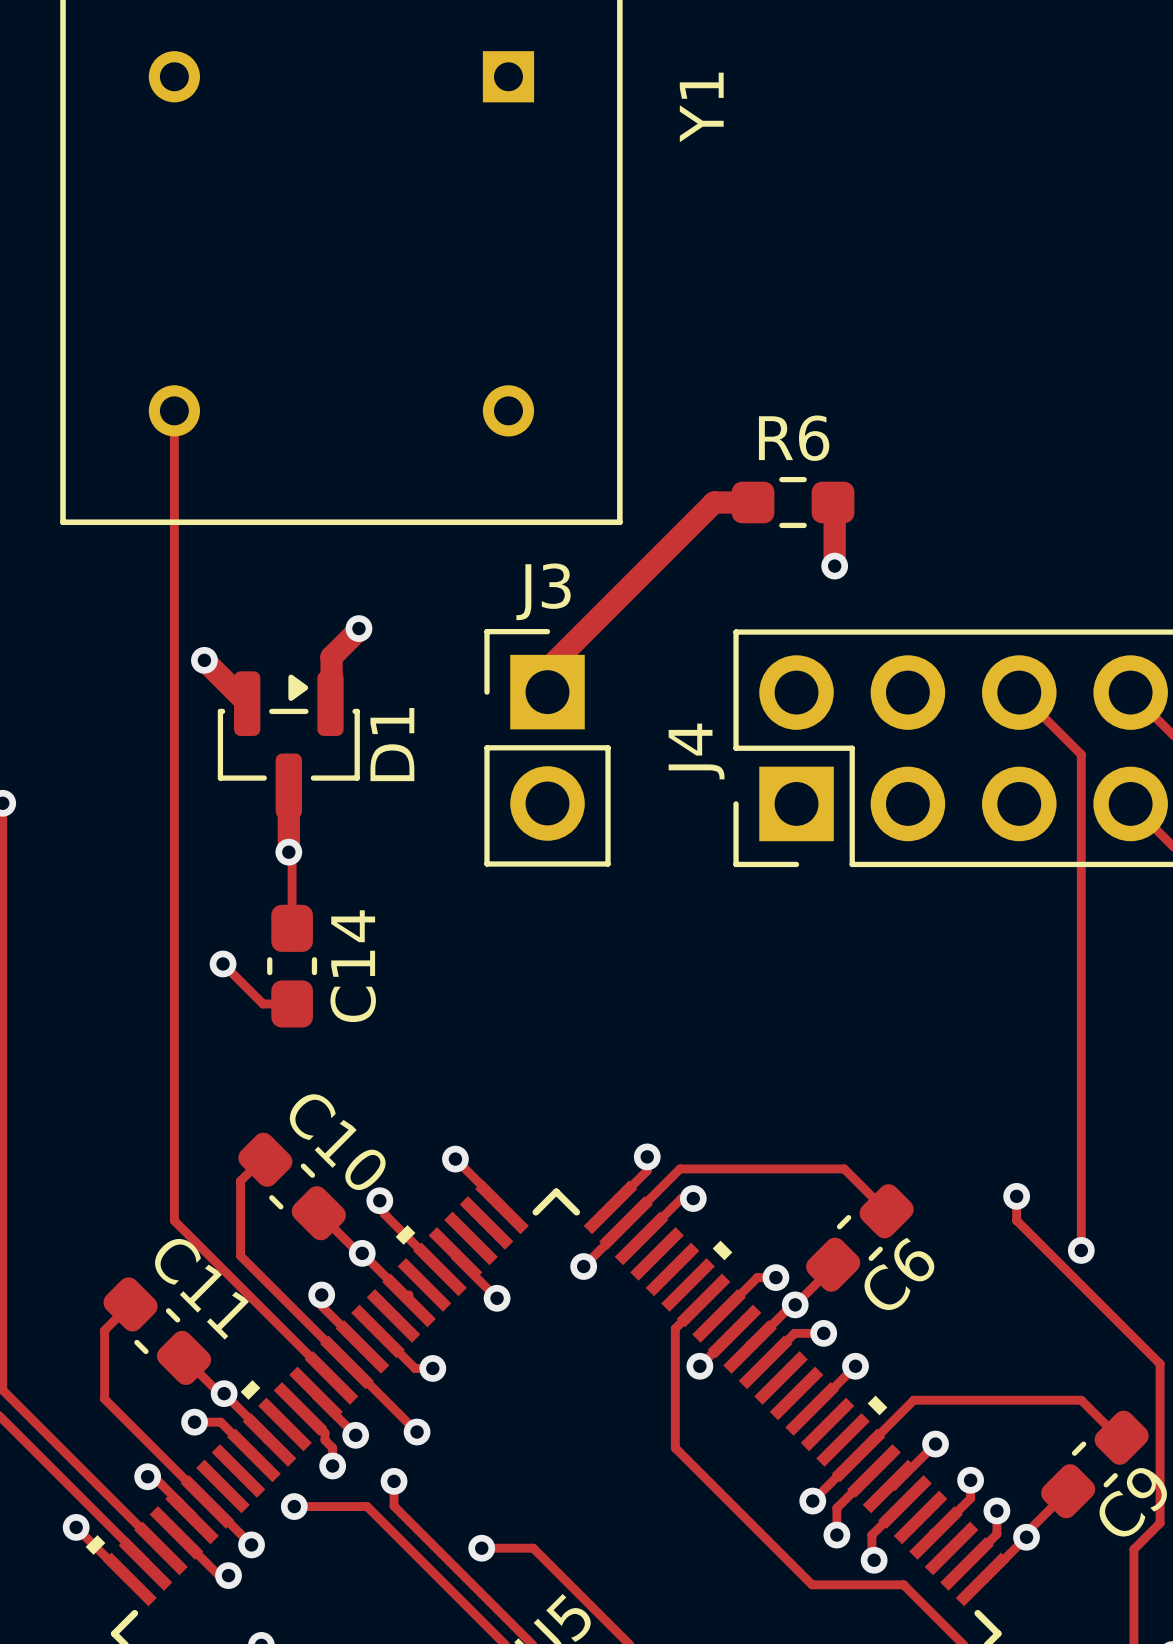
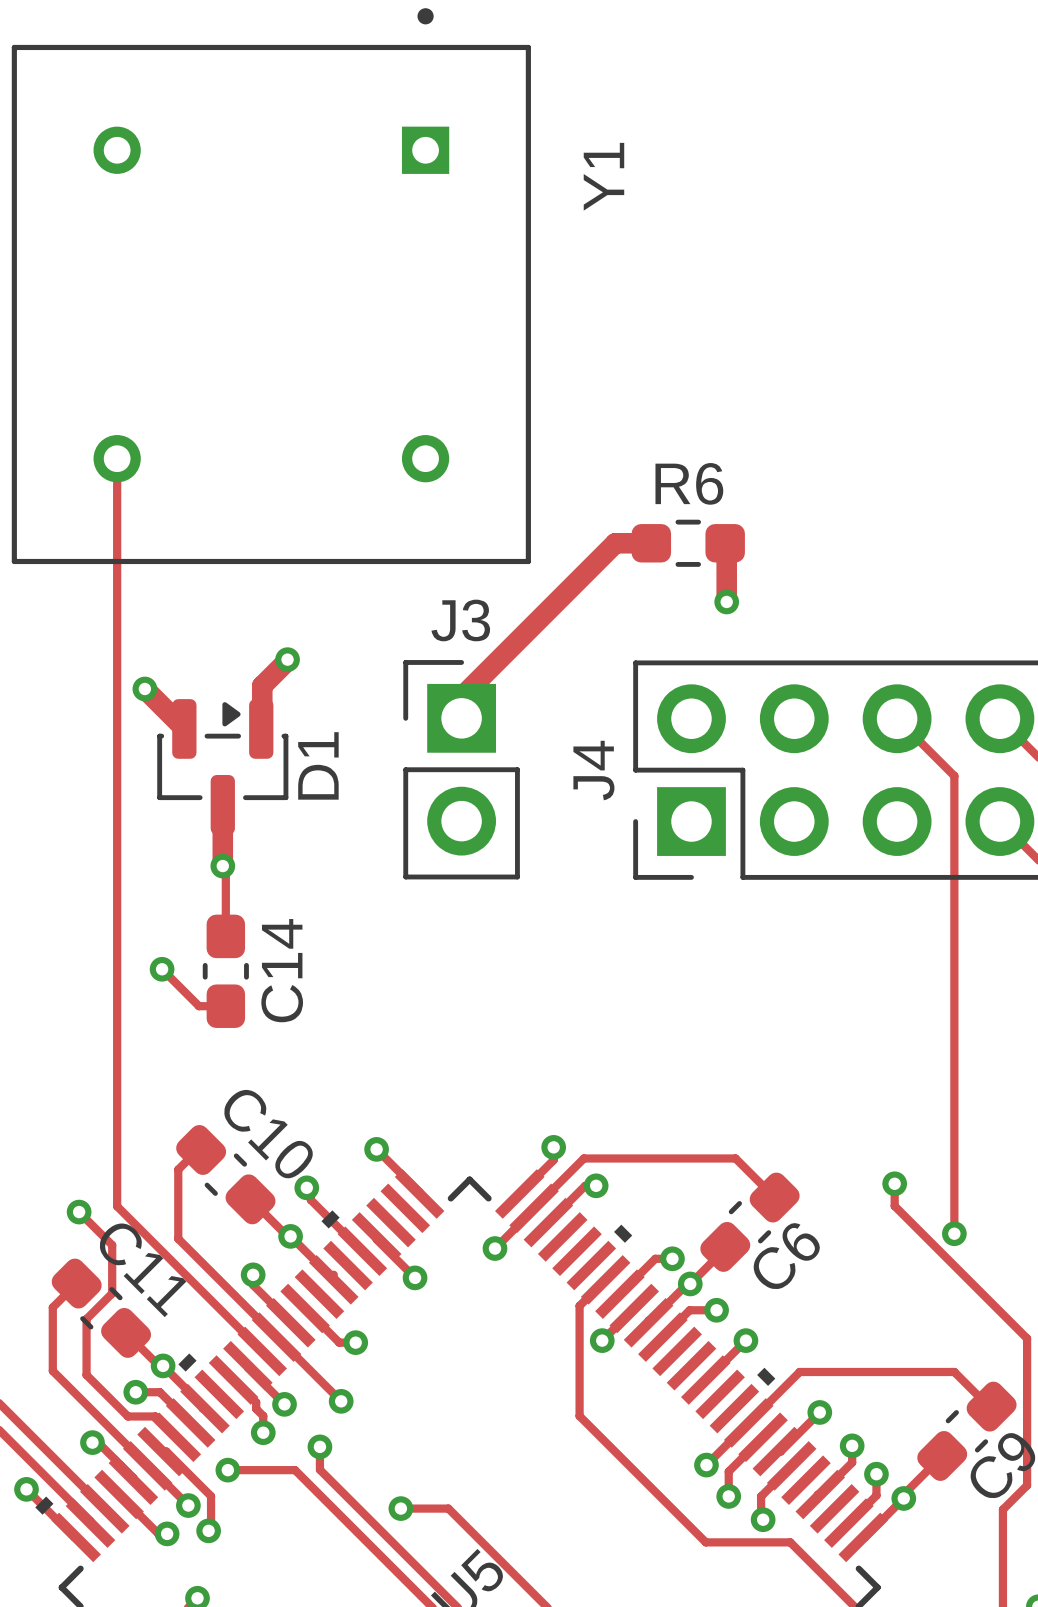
track: none -> (79, 1212) (112, 1245) (112, 1293) (86, 1319) (86, 1375) (127, 1416) (155, 1416) (176, 1437)
via: none -> (79, 1212)
track: none -> (162, 1451) (166, 1451) (211, 1496) (211, 1528) (208, 1530)
via: none -> (208, 1530)

